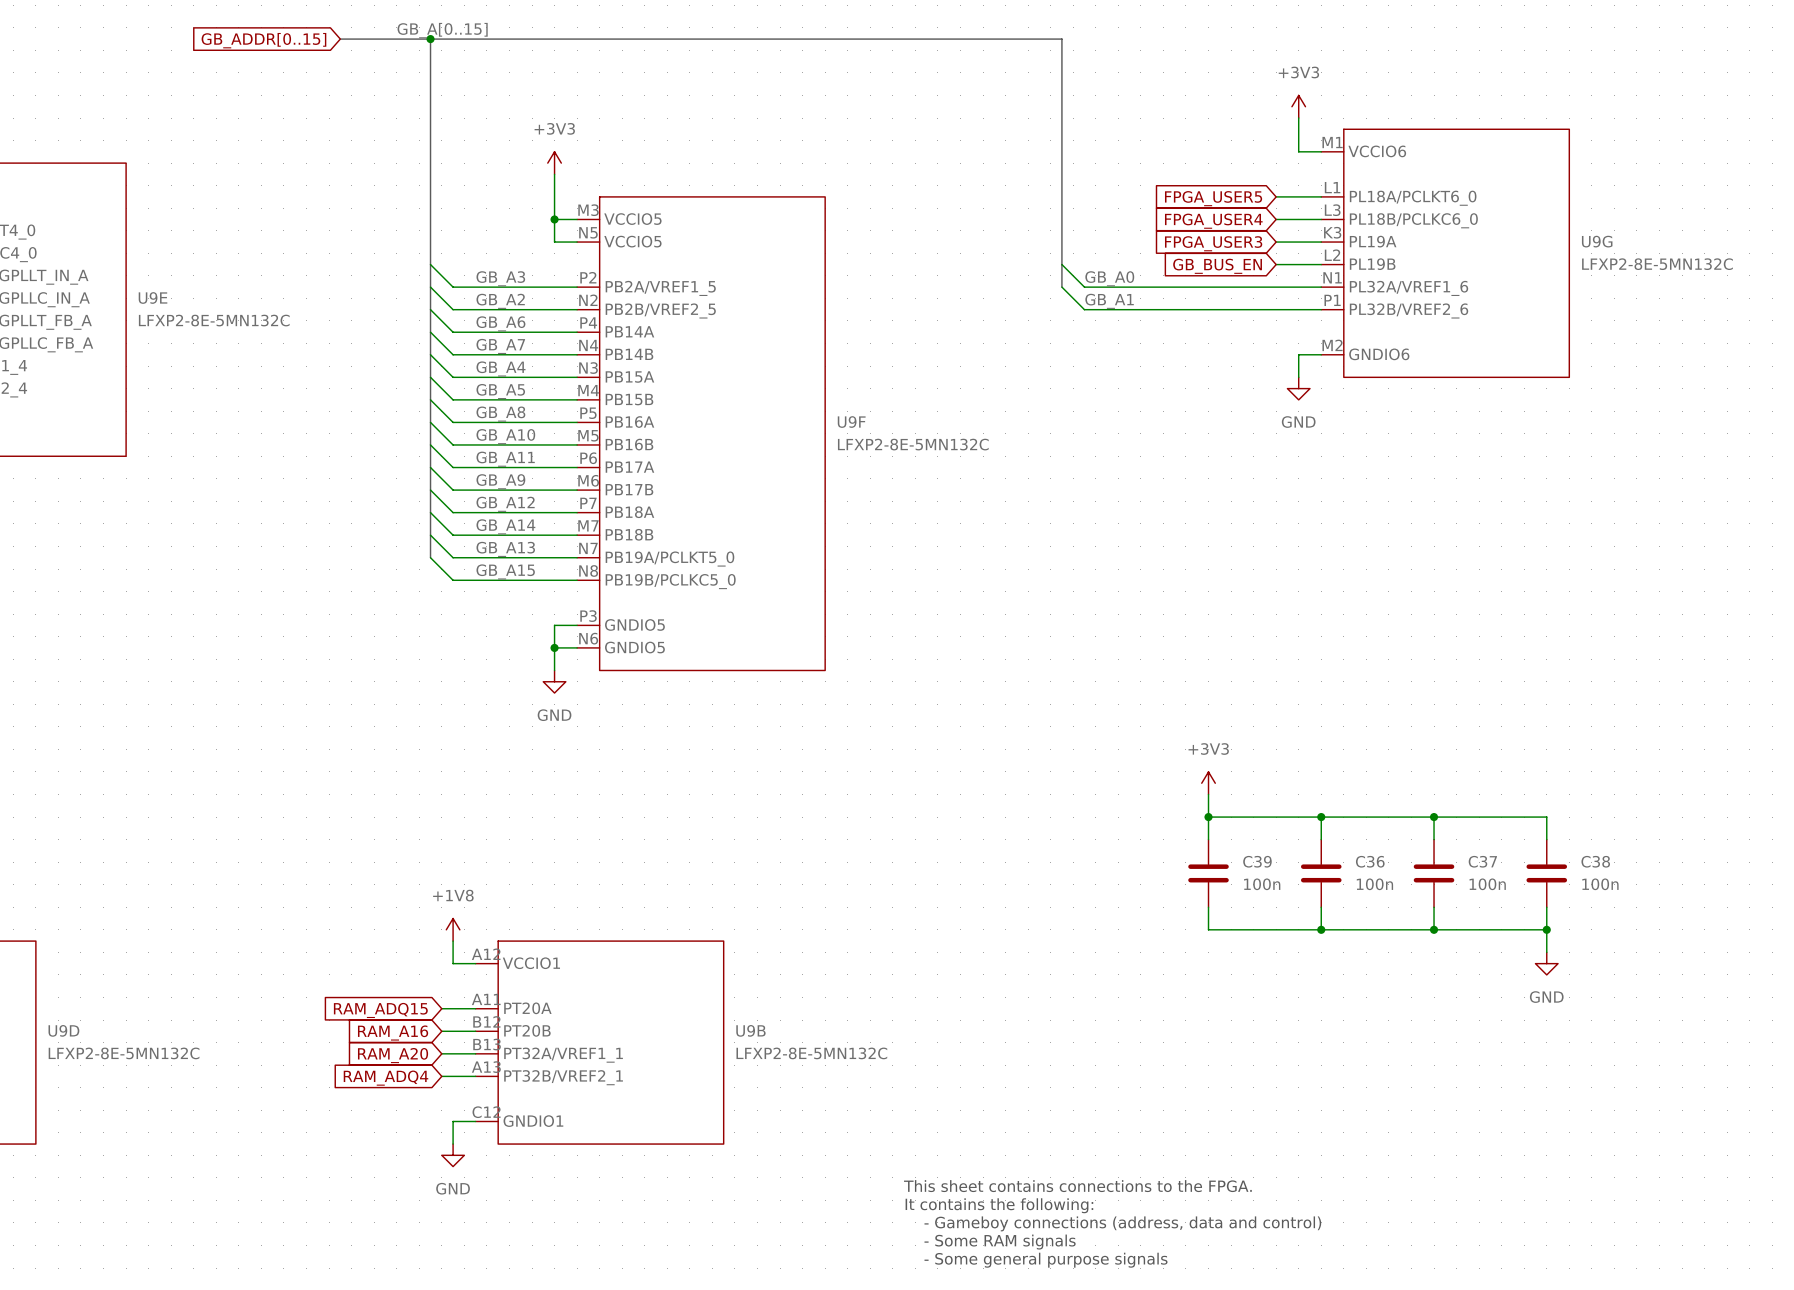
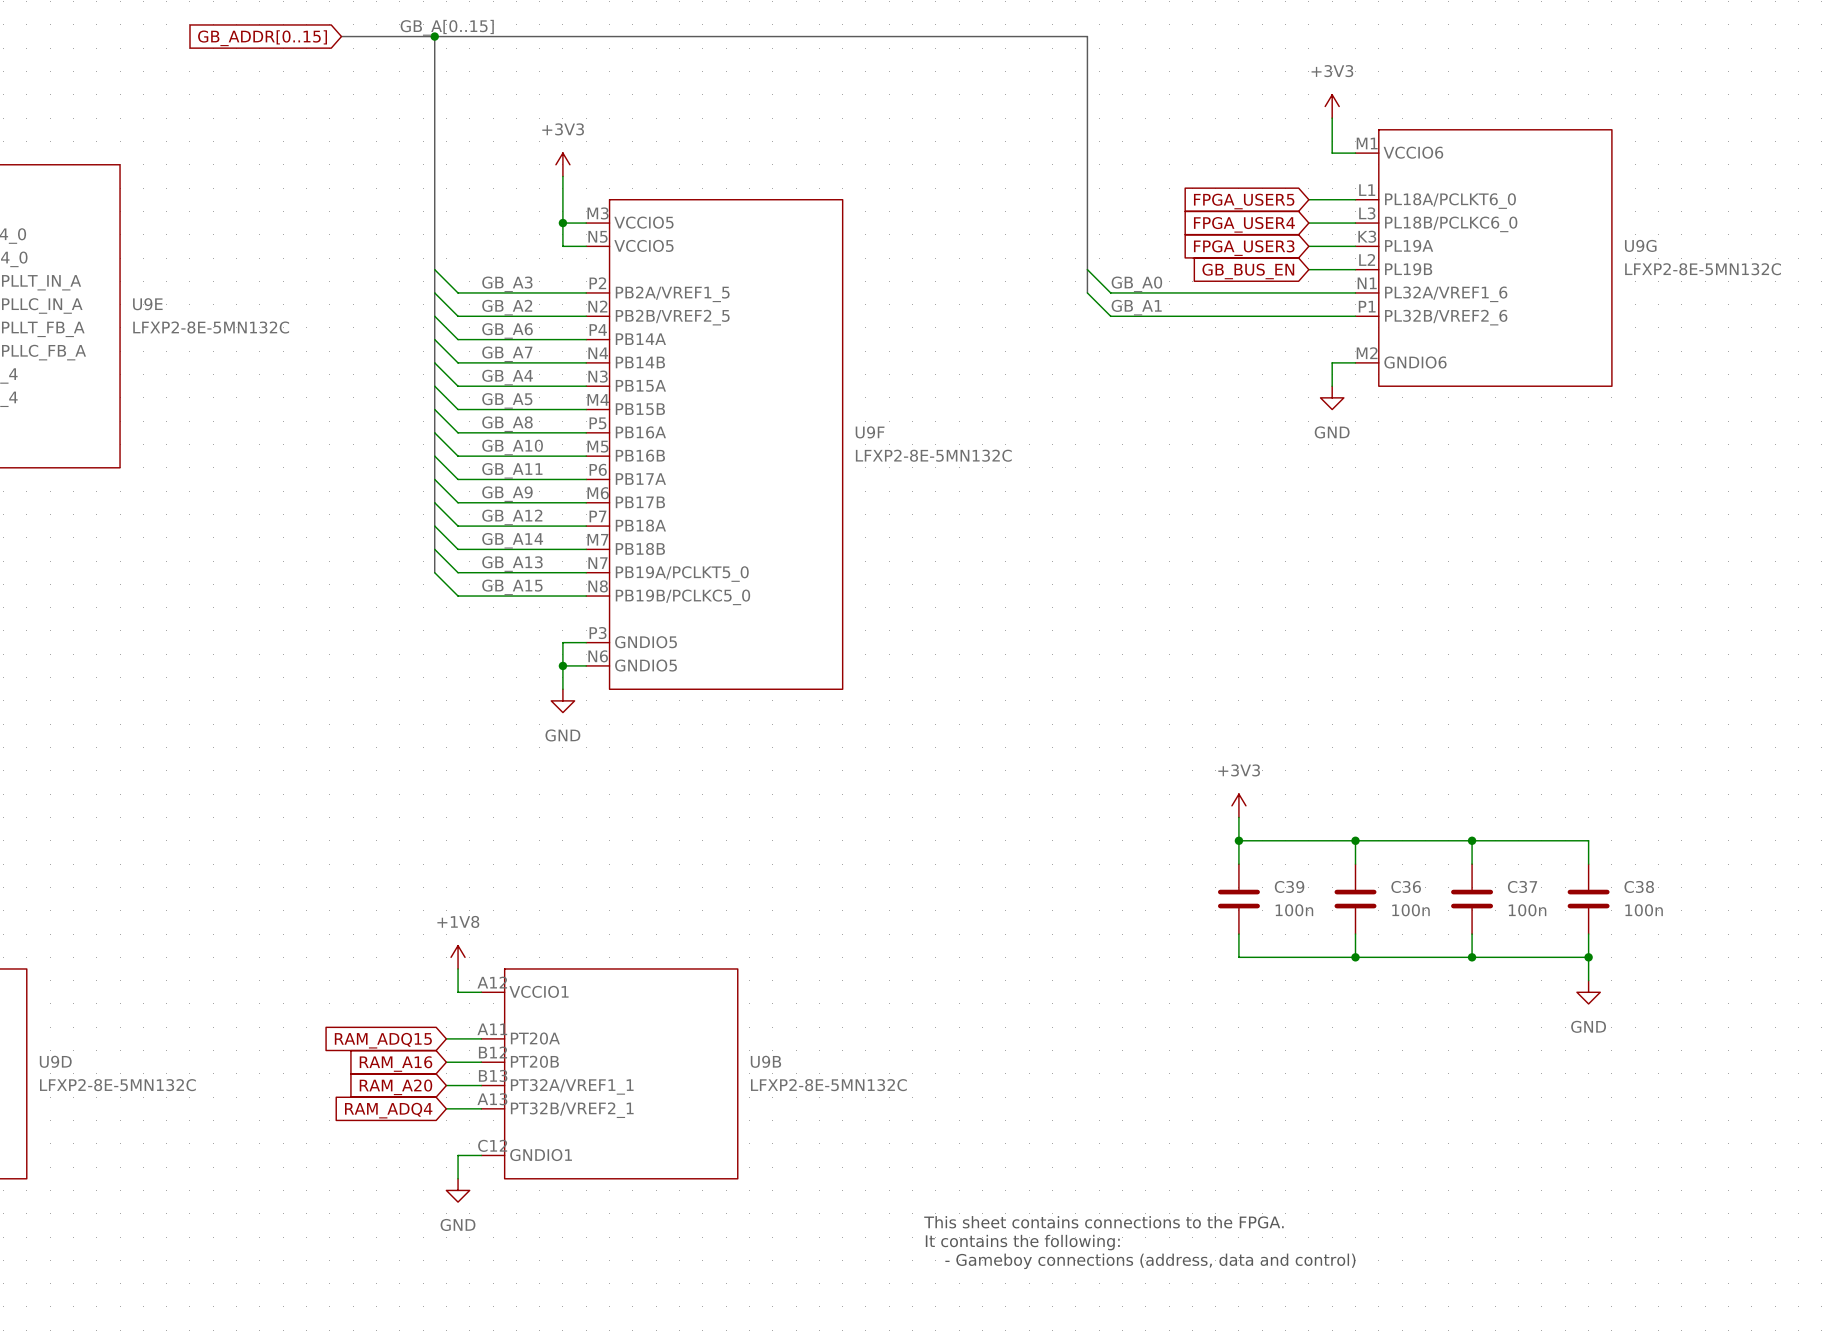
text: - Some RAM signals (1000, 1242) -> none
text: - Some general purpose signals (1046, 1260) -> none

